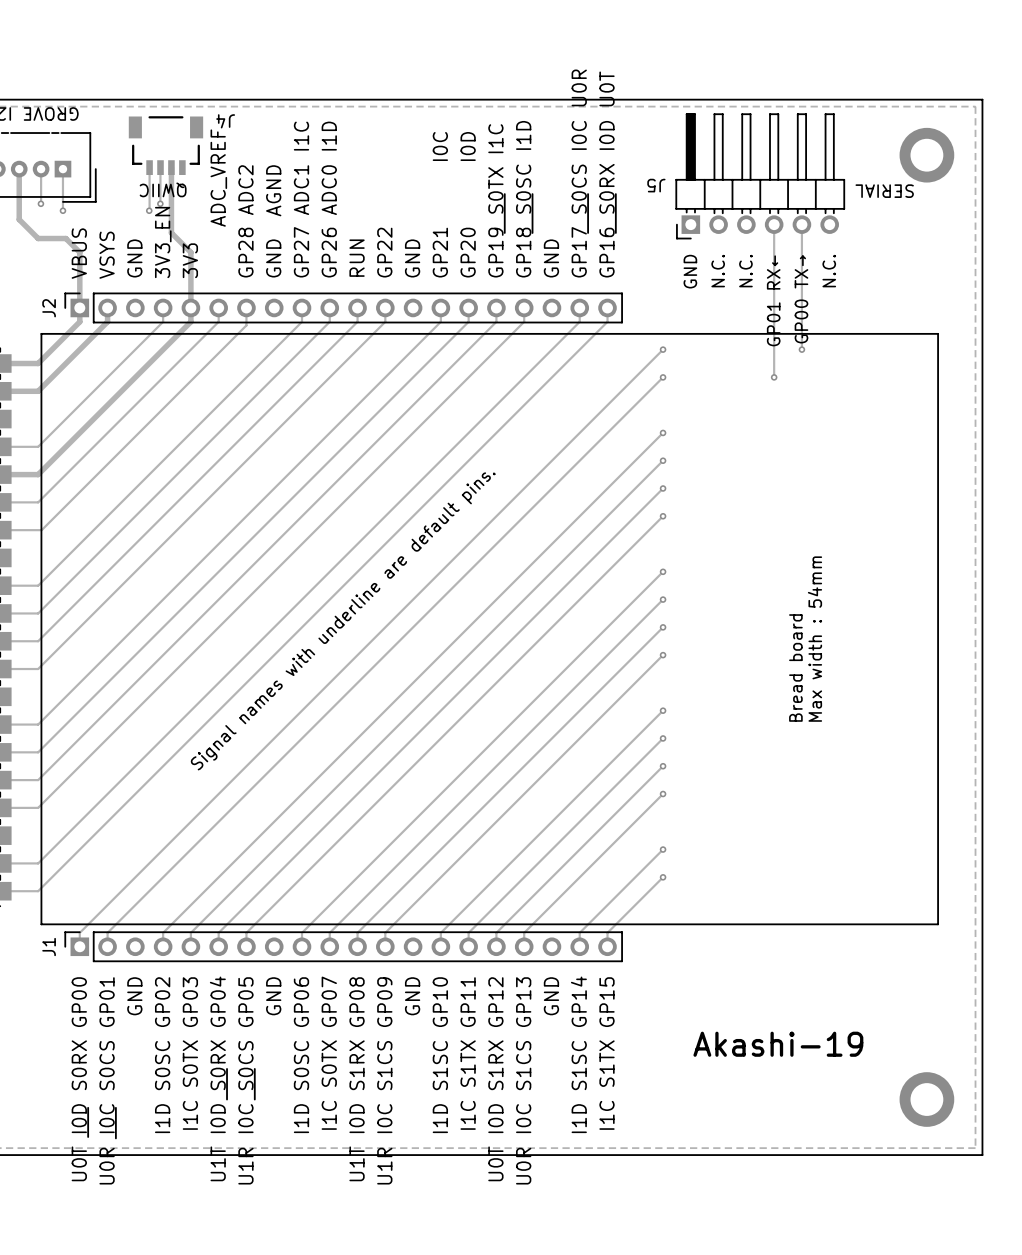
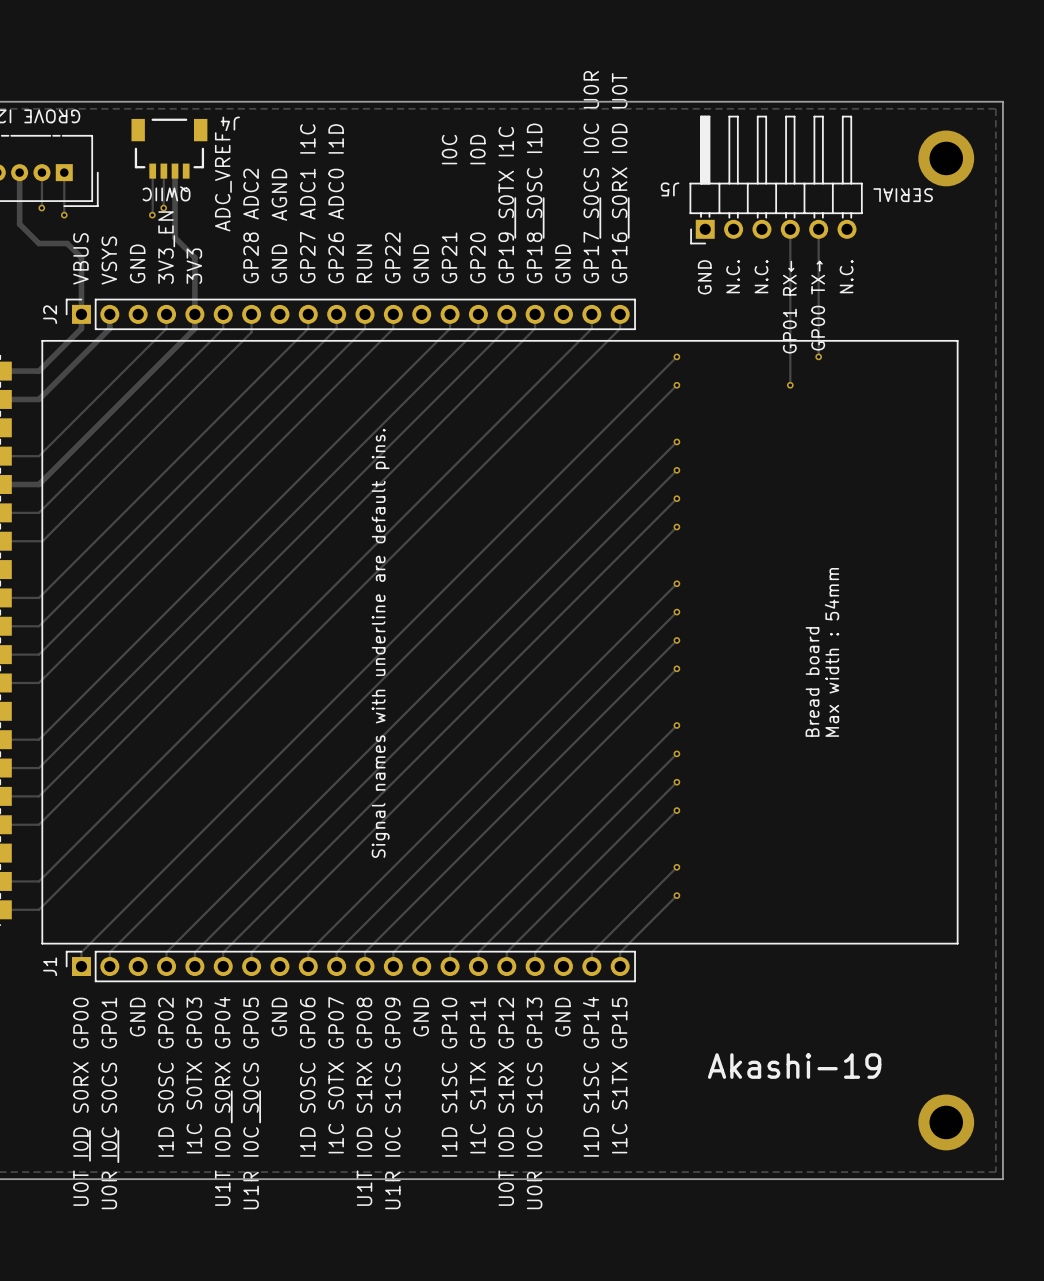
text rotation: 0° (343, 621) -> 45° counterclockwise (380, 643)

